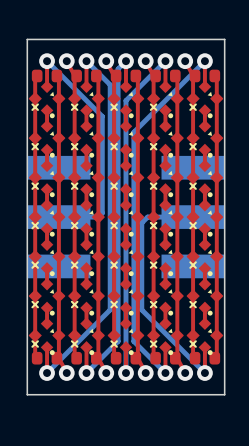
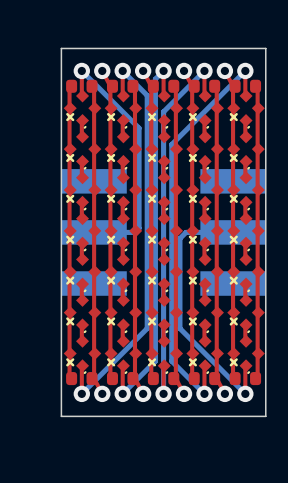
part footprint: [28, 80, 66, 119] -> [63, 89, 102, 129]
part footprint: [68, 80, 105, 119] -> [104, 89, 143, 129]
part footprint: [107, 80, 145, 119] -> [145, 89, 184, 129]
part footprint: [147, 80, 184, 119] -> [186, 89, 224, 129]
part footprint: [186, 80, 224, 119] -> [227, 89, 265, 129]
part footprint: [28, 120, 66, 158] -> [63, 130, 102, 170]
part footprint: [68, 120, 105, 158] -> [104, 130, 143, 170]
part footprint: [107, 120, 145, 158] -> [145, 130, 184, 170]
part footprint: [147, 120, 184, 158] -> [186, 130, 224, 170]
part footprint: [186, 120, 224, 158] -> [227, 130, 265, 170]
part footprint: [28, 159, 66, 198] -> [63, 171, 102, 211]
part footprint: [68, 159, 105, 198] -> [104, 171, 143, 211]
part footprint: [107, 159, 145, 198] -> [145, 171, 184, 211]
part footprint: [147, 159, 184, 198] -> [186, 171, 224, 211]
part footprint: [186, 159, 224, 198] -> [227, 171, 265, 211]
part footprint: [28, 199, 66, 237] -> [63, 212, 102, 252]
part footprint: [68, 199, 105, 237] -> [104, 212, 143, 252]
part footprint: [107, 199, 145, 237] -> [145, 212, 184, 252]
part footprint: [147, 199, 184, 237] -> [186, 212, 224, 252]
part footprint: [186, 199, 224, 237] -> [227, 212, 265, 252]
part footprint: [28, 238, 66, 277] -> [63, 252, 102, 293]
part footprint: [68, 238, 105, 277] -> [104, 252, 143, 293]
part footprint: [107, 238, 145, 277] -> [145, 252, 184, 293]
part footprint: [147, 238, 184, 277] -> [186, 252, 224, 293]
part footprint: [186, 238, 224, 277] -> [227, 252, 265, 293]
part footprint: [28, 278, 66, 316] -> [63, 293, 102, 334]
part footprint: [68, 278, 105, 316] -> [104, 293, 143, 334]
part footprint: [107, 278, 145, 316] -> [145, 293, 184, 334]
part footprint: [147, 278, 184, 316] -> [186, 293, 224, 334]
part footprint: [186, 278, 224, 316] -> [227, 293, 265, 334]
part footprint: [28, 317, 66, 356] -> [63, 334, 102, 375]
part footprint: [68, 317, 105, 356] -> [104, 334, 143, 375]
part footprint: [107, 317, 145, 356] -> [145, 334, 184, 375]
part footprint: [147, 317, 184, 356] -> [186, 334, 224, 375]
part footprint: [186, 317, 224, 356] -> [227, 334, 265, 375]

